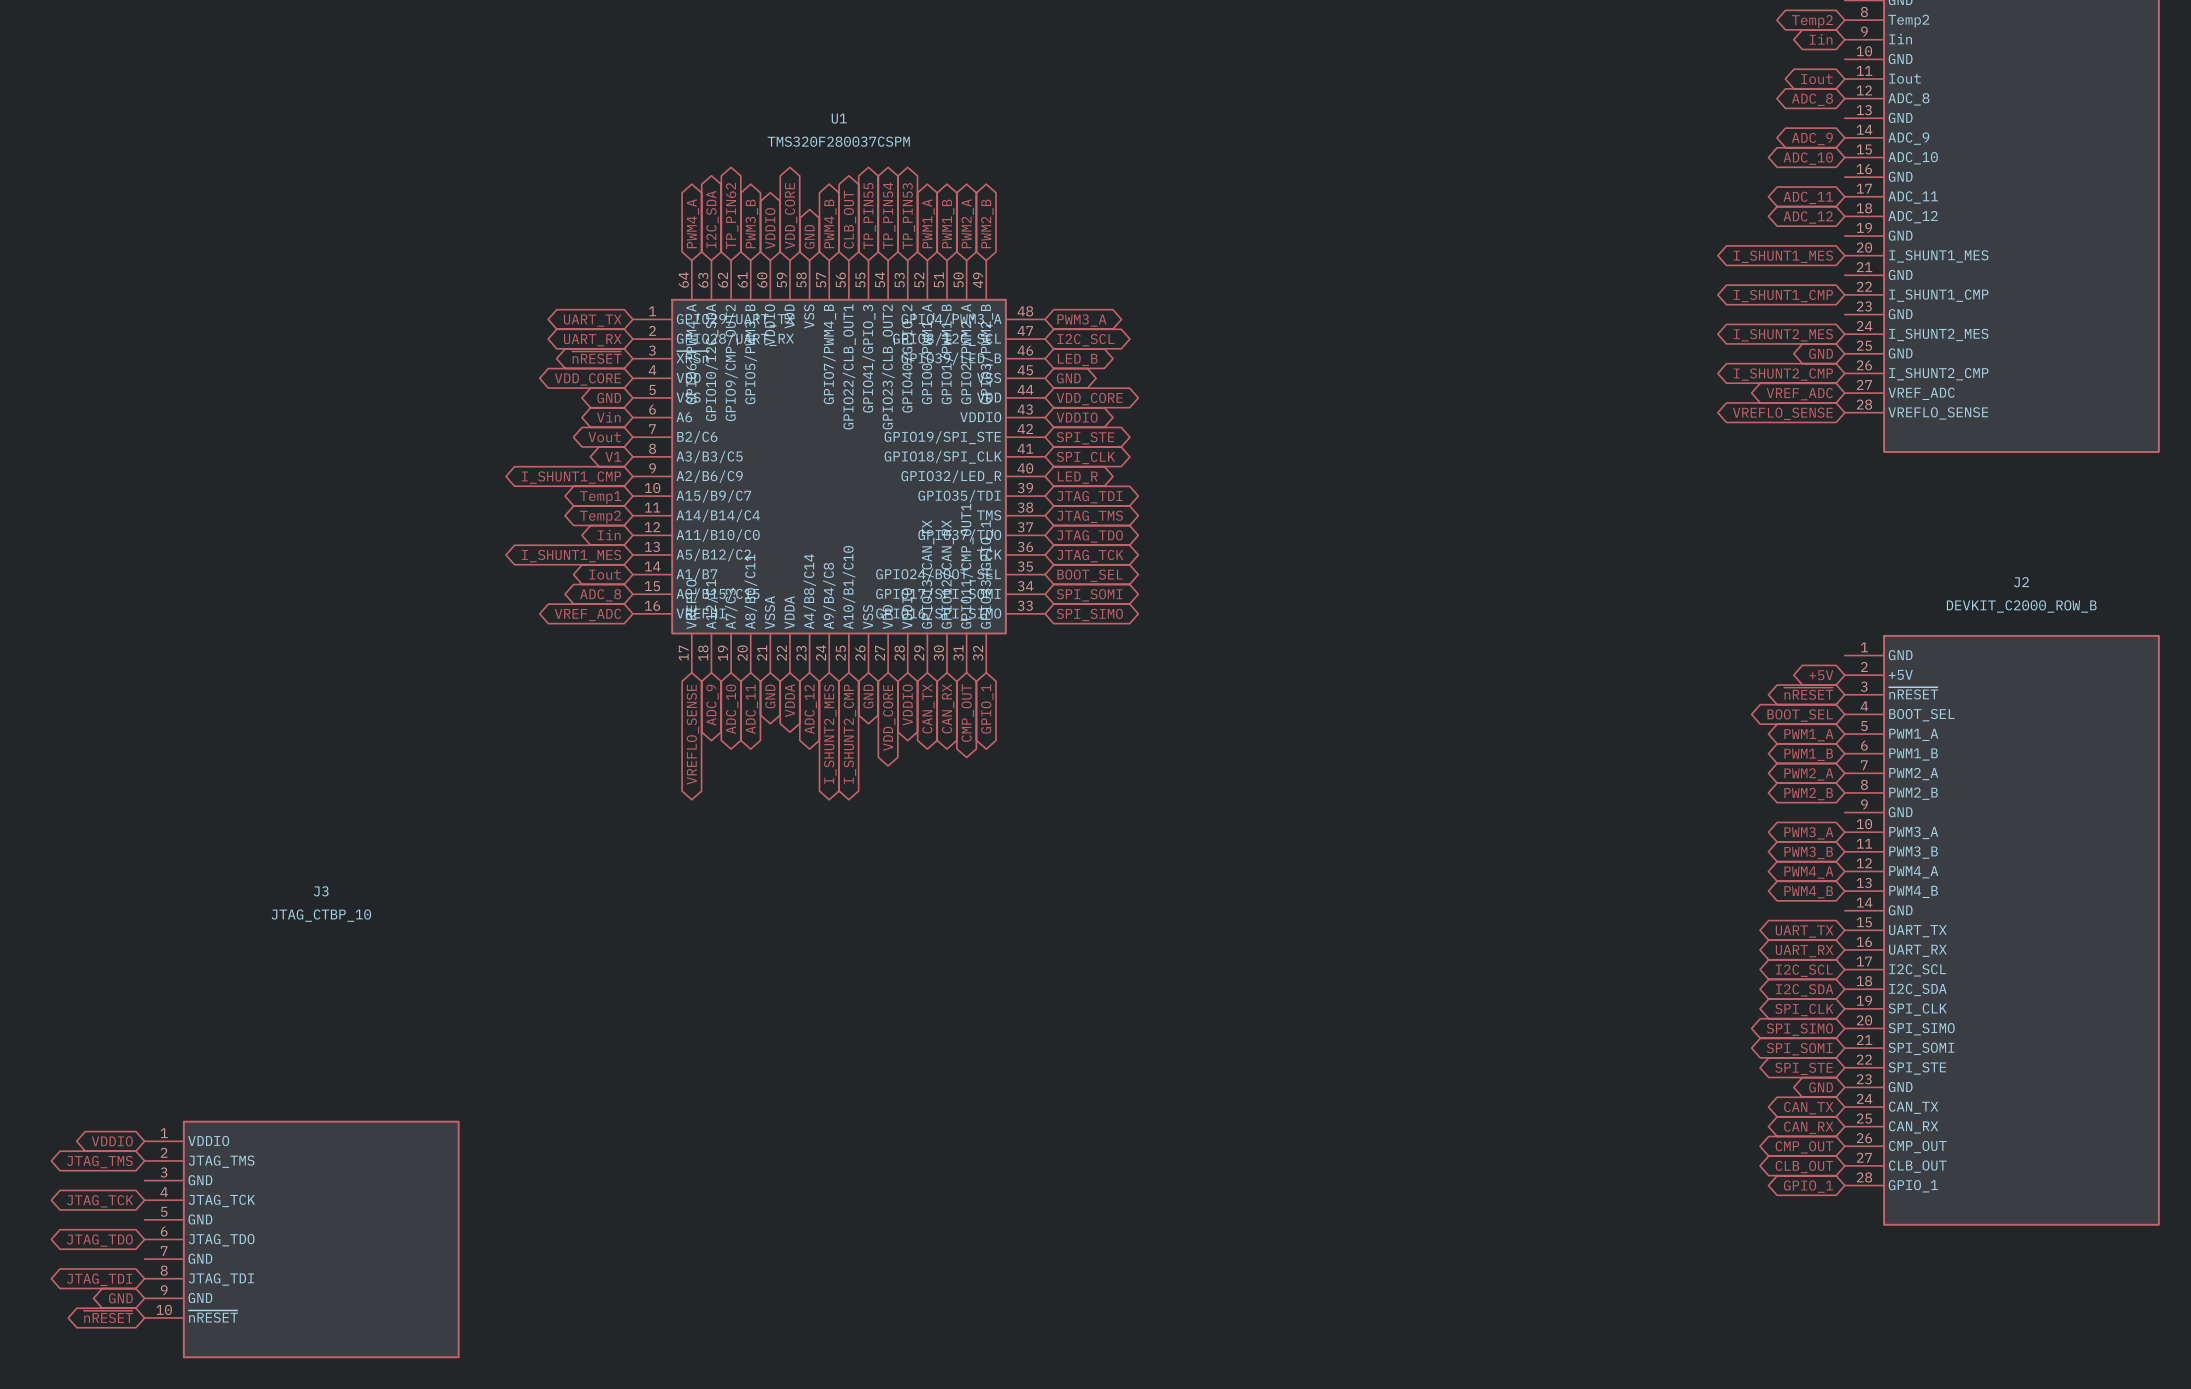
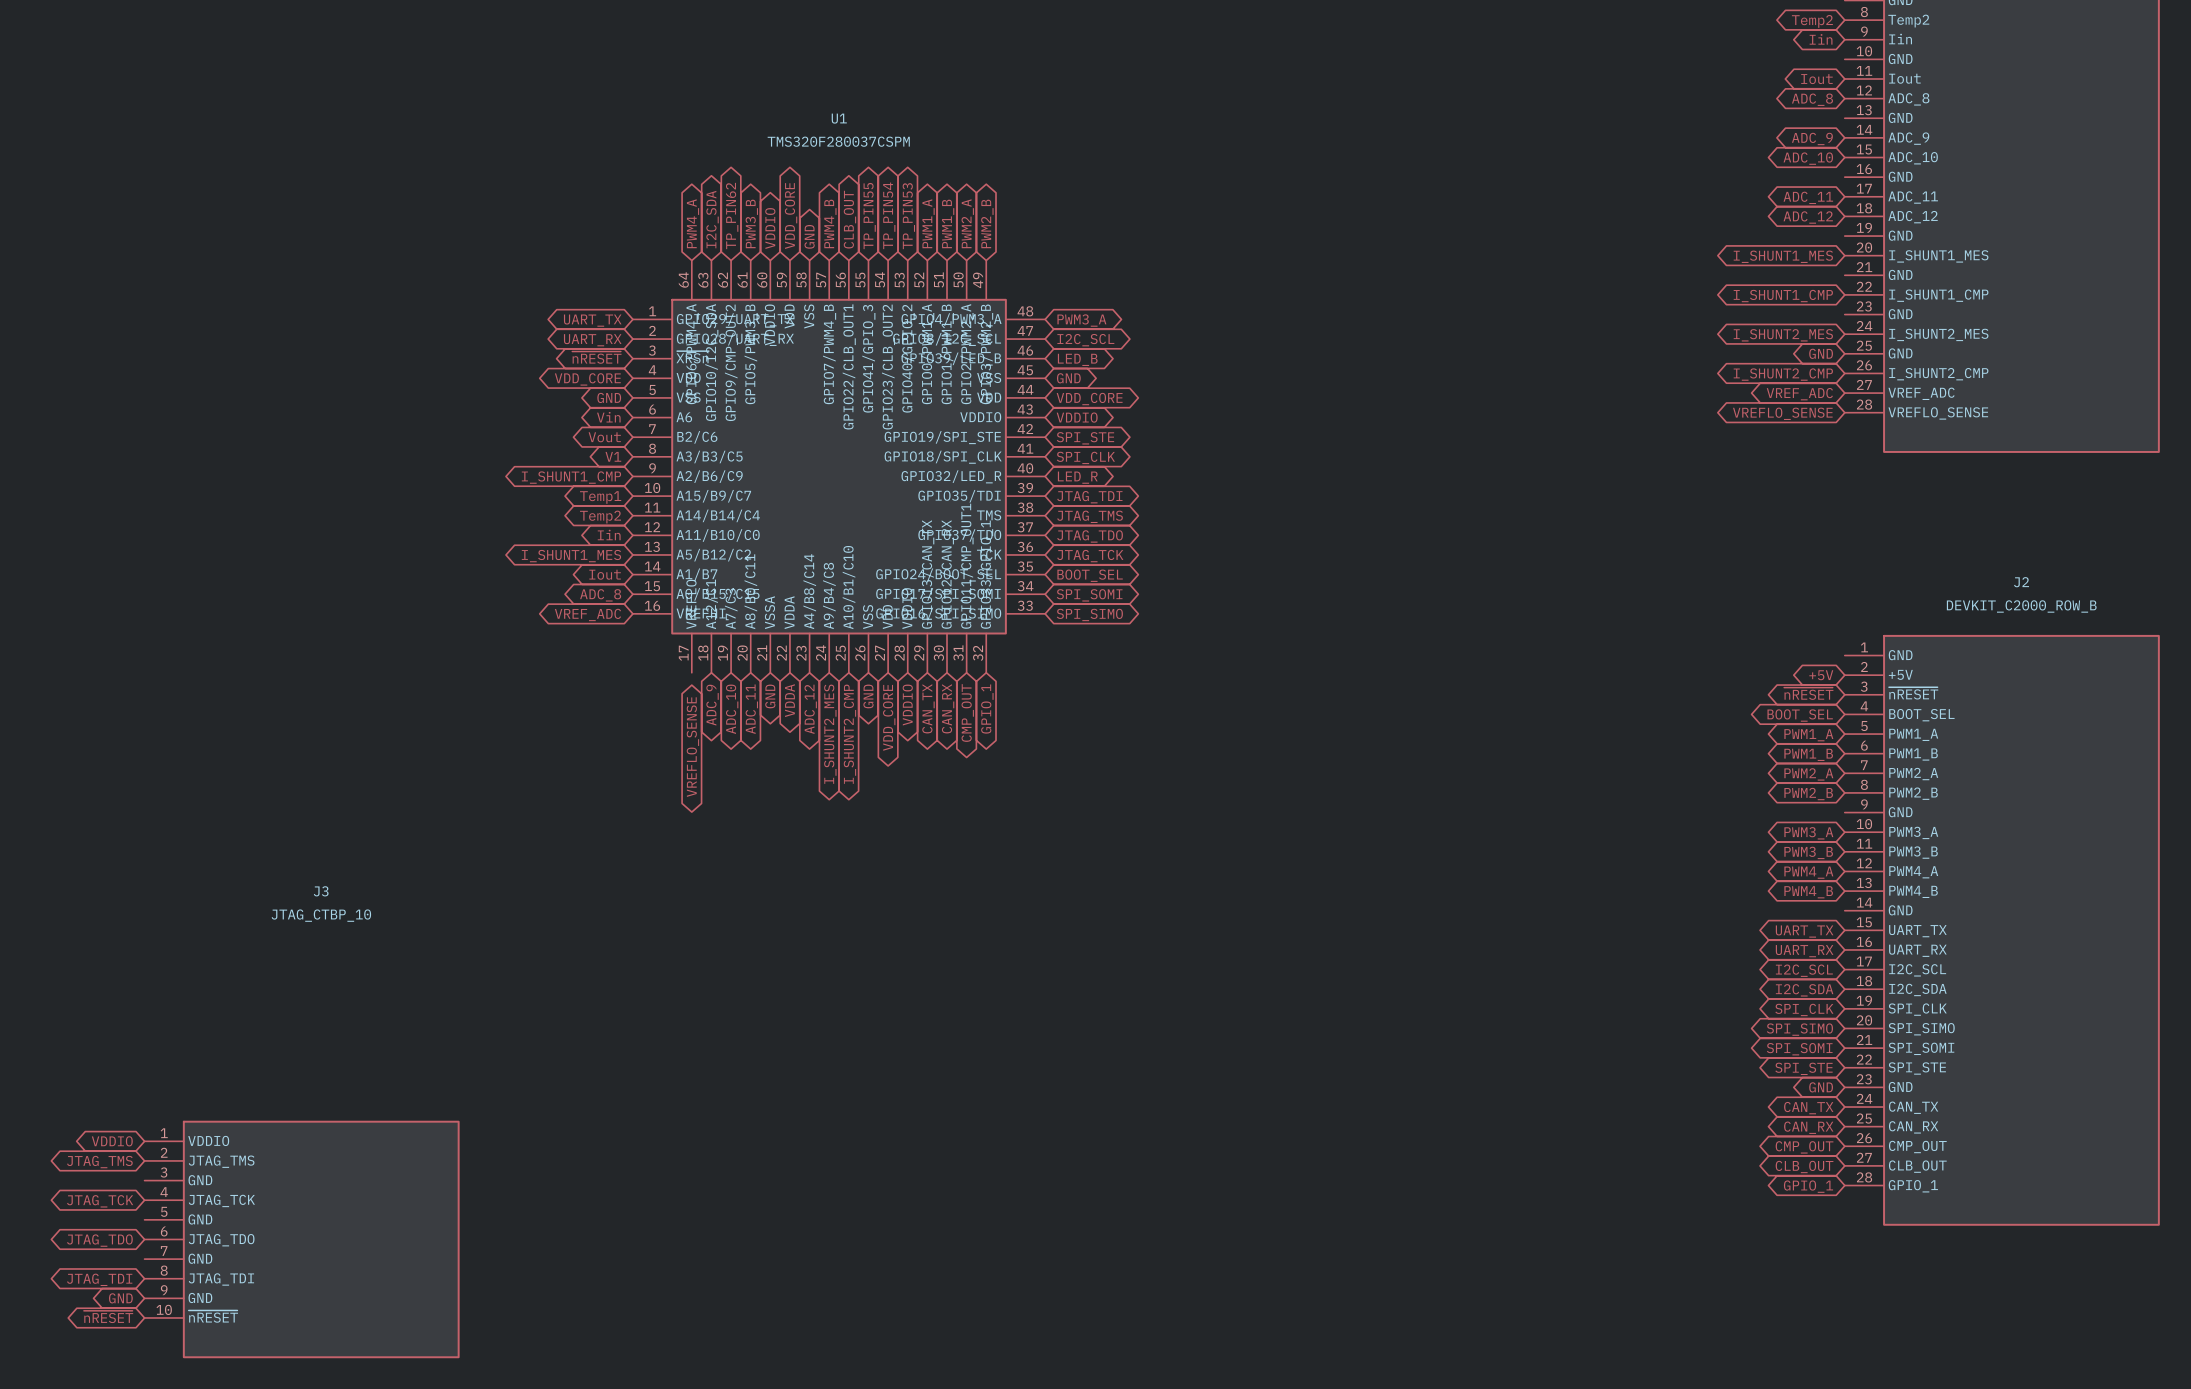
global label position: VREFLO_SENSE (692, 734) -> VREFLO_SENSE (692, 747)

